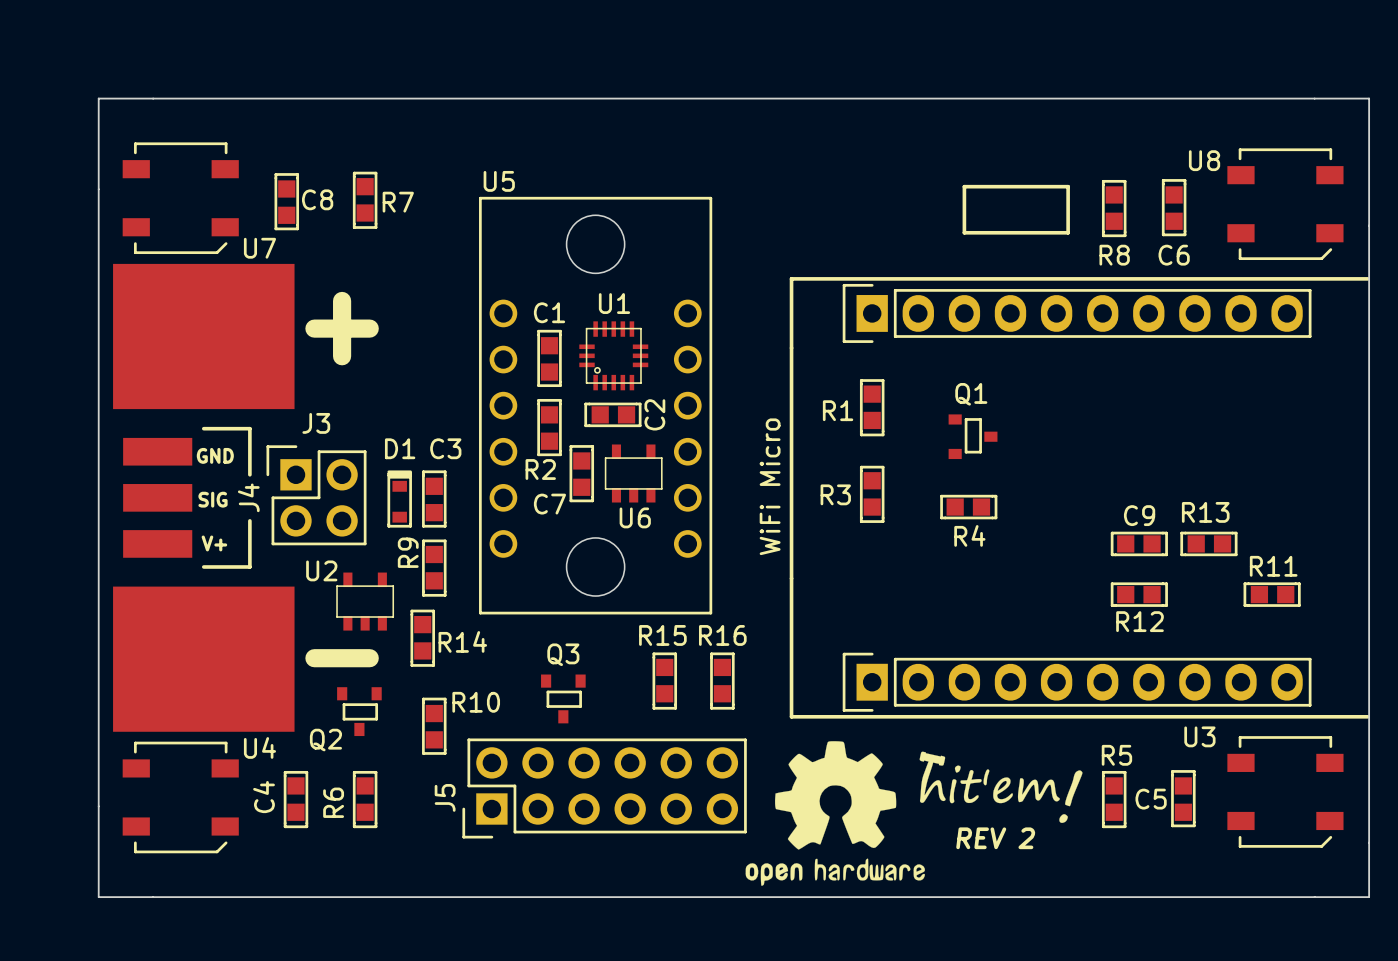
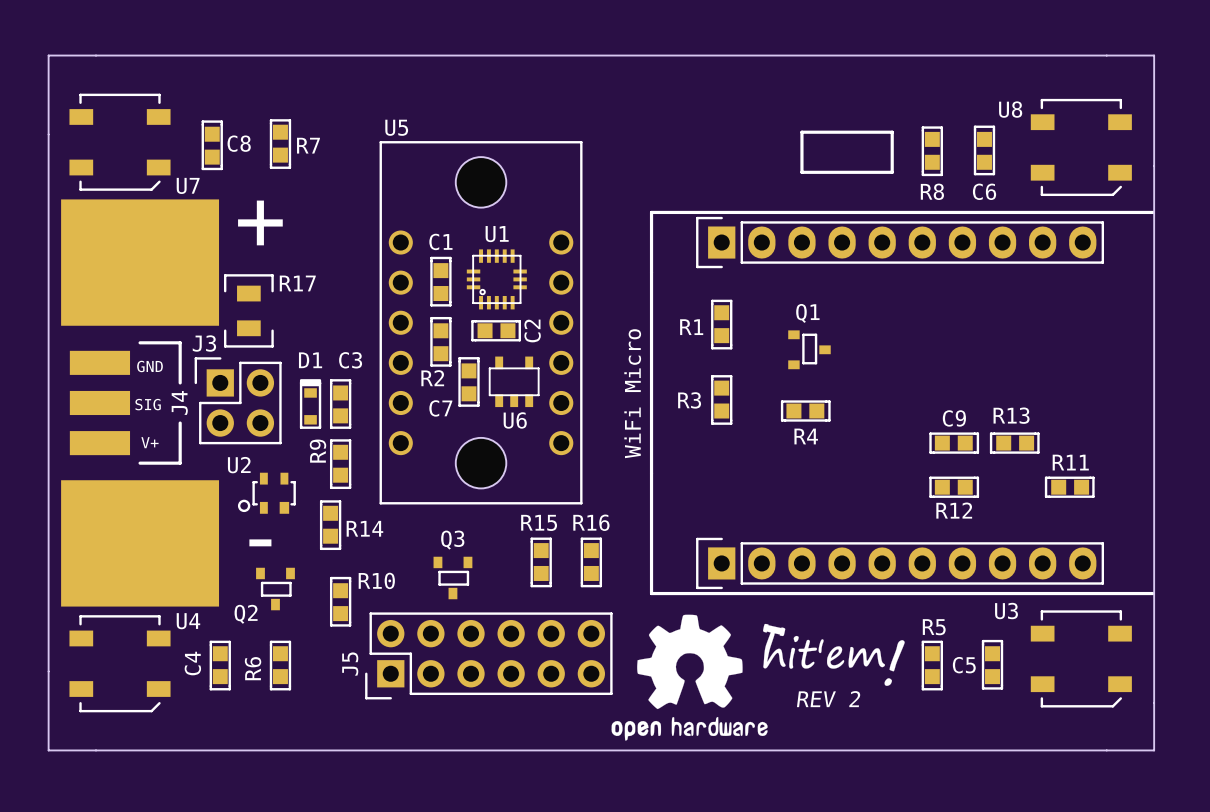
text position: + (342, 328) -> + (260, 222)
R17: none -> (248, 310)
J3 name position: J3 (316, 423) -> J3 (204, 343)
U2 footprint: [337, 572, 394, 631] -> [237, 472, 296, 514]

